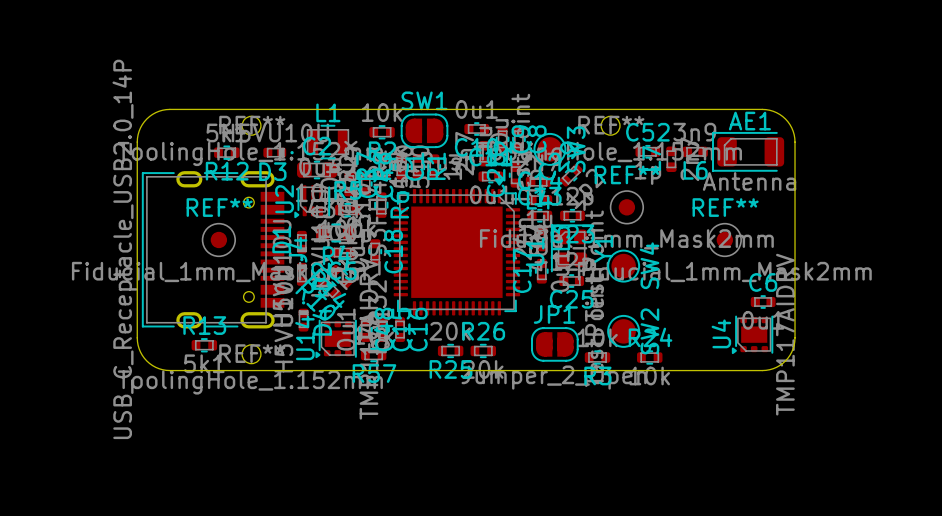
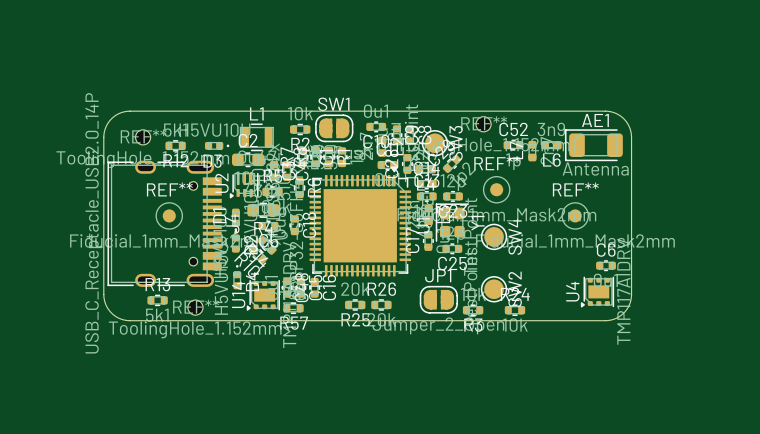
REF** position: (251, 125) -> (143, 137)

